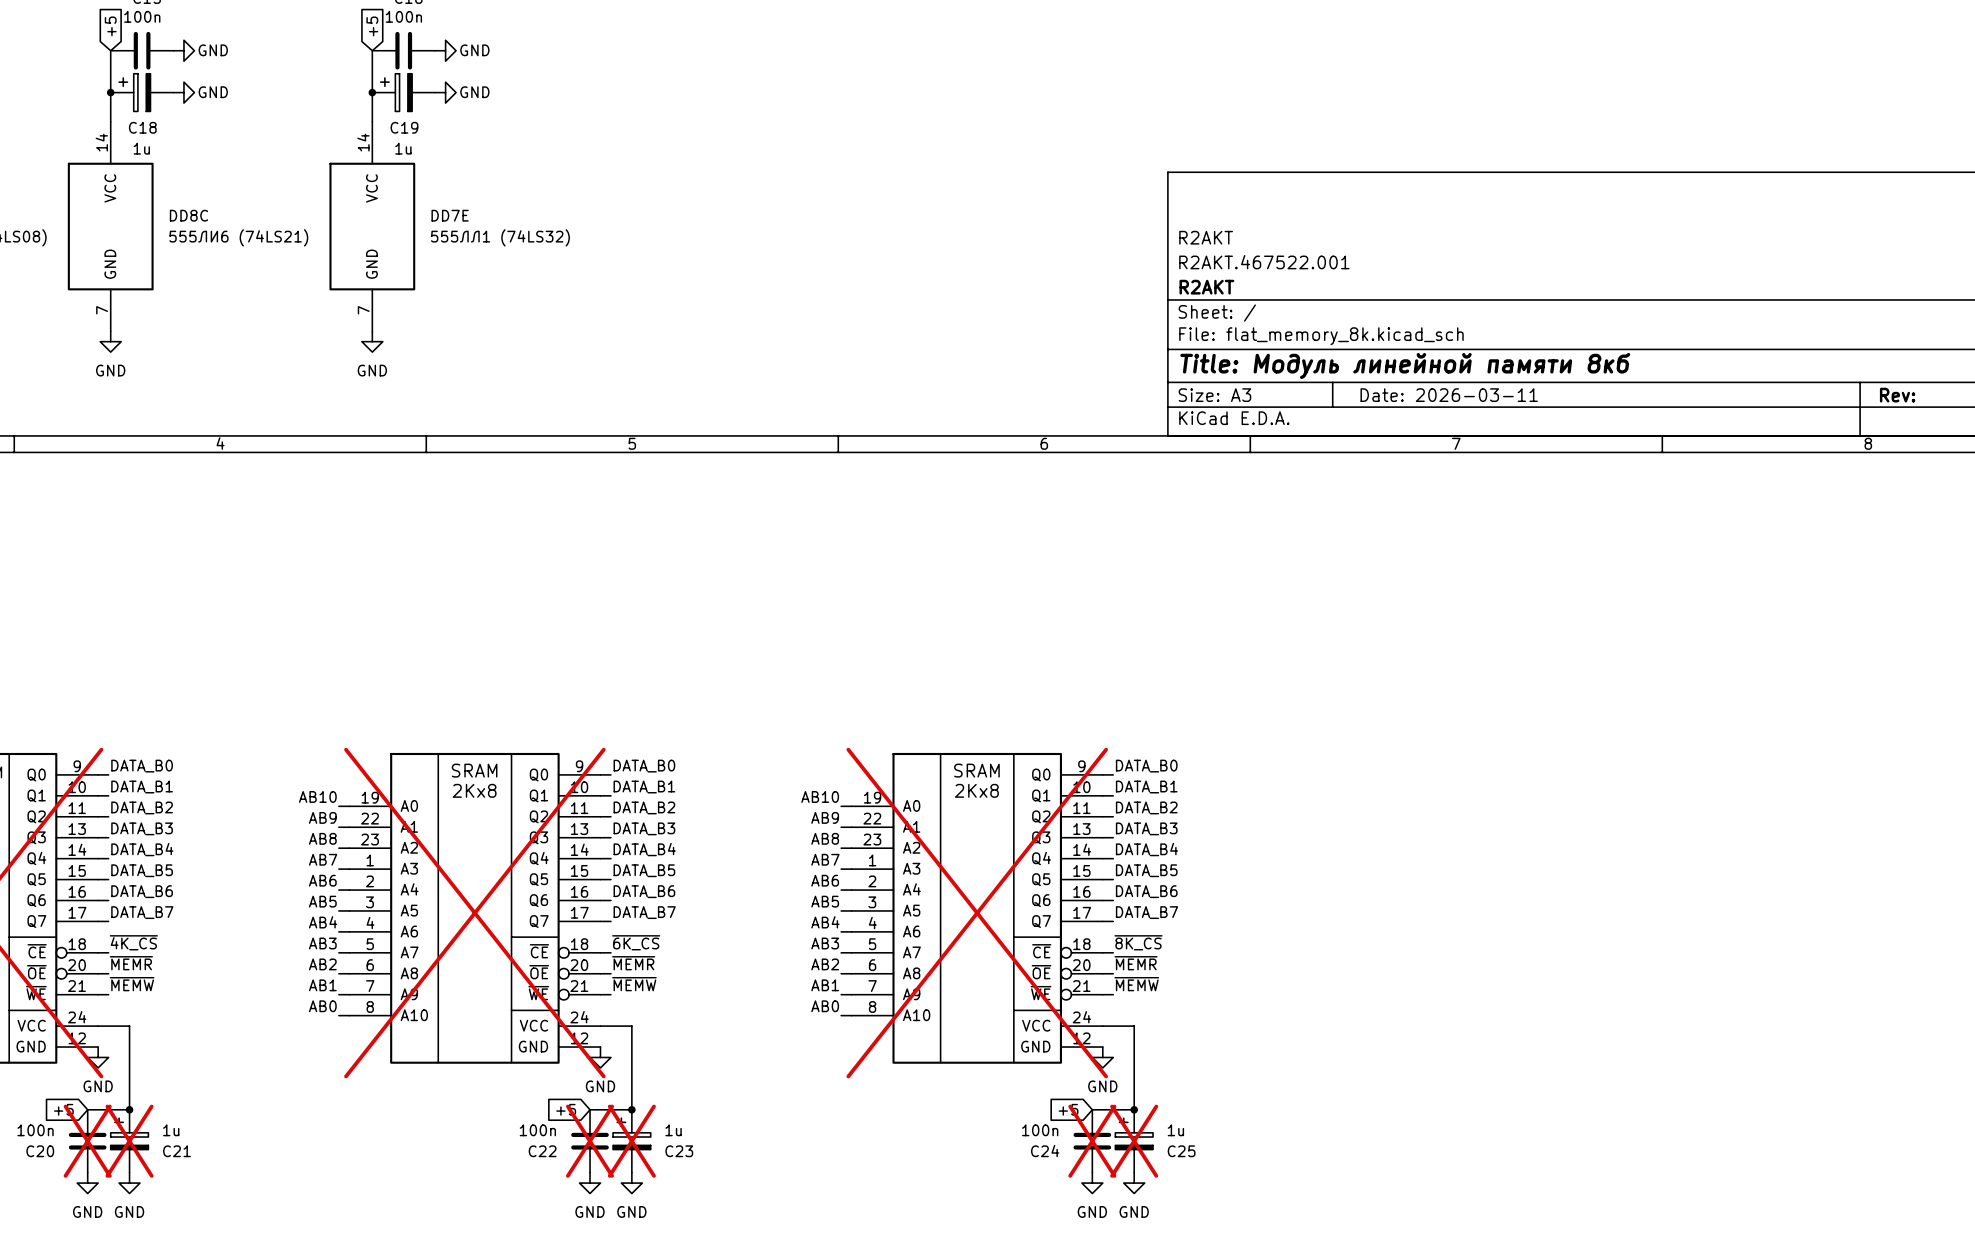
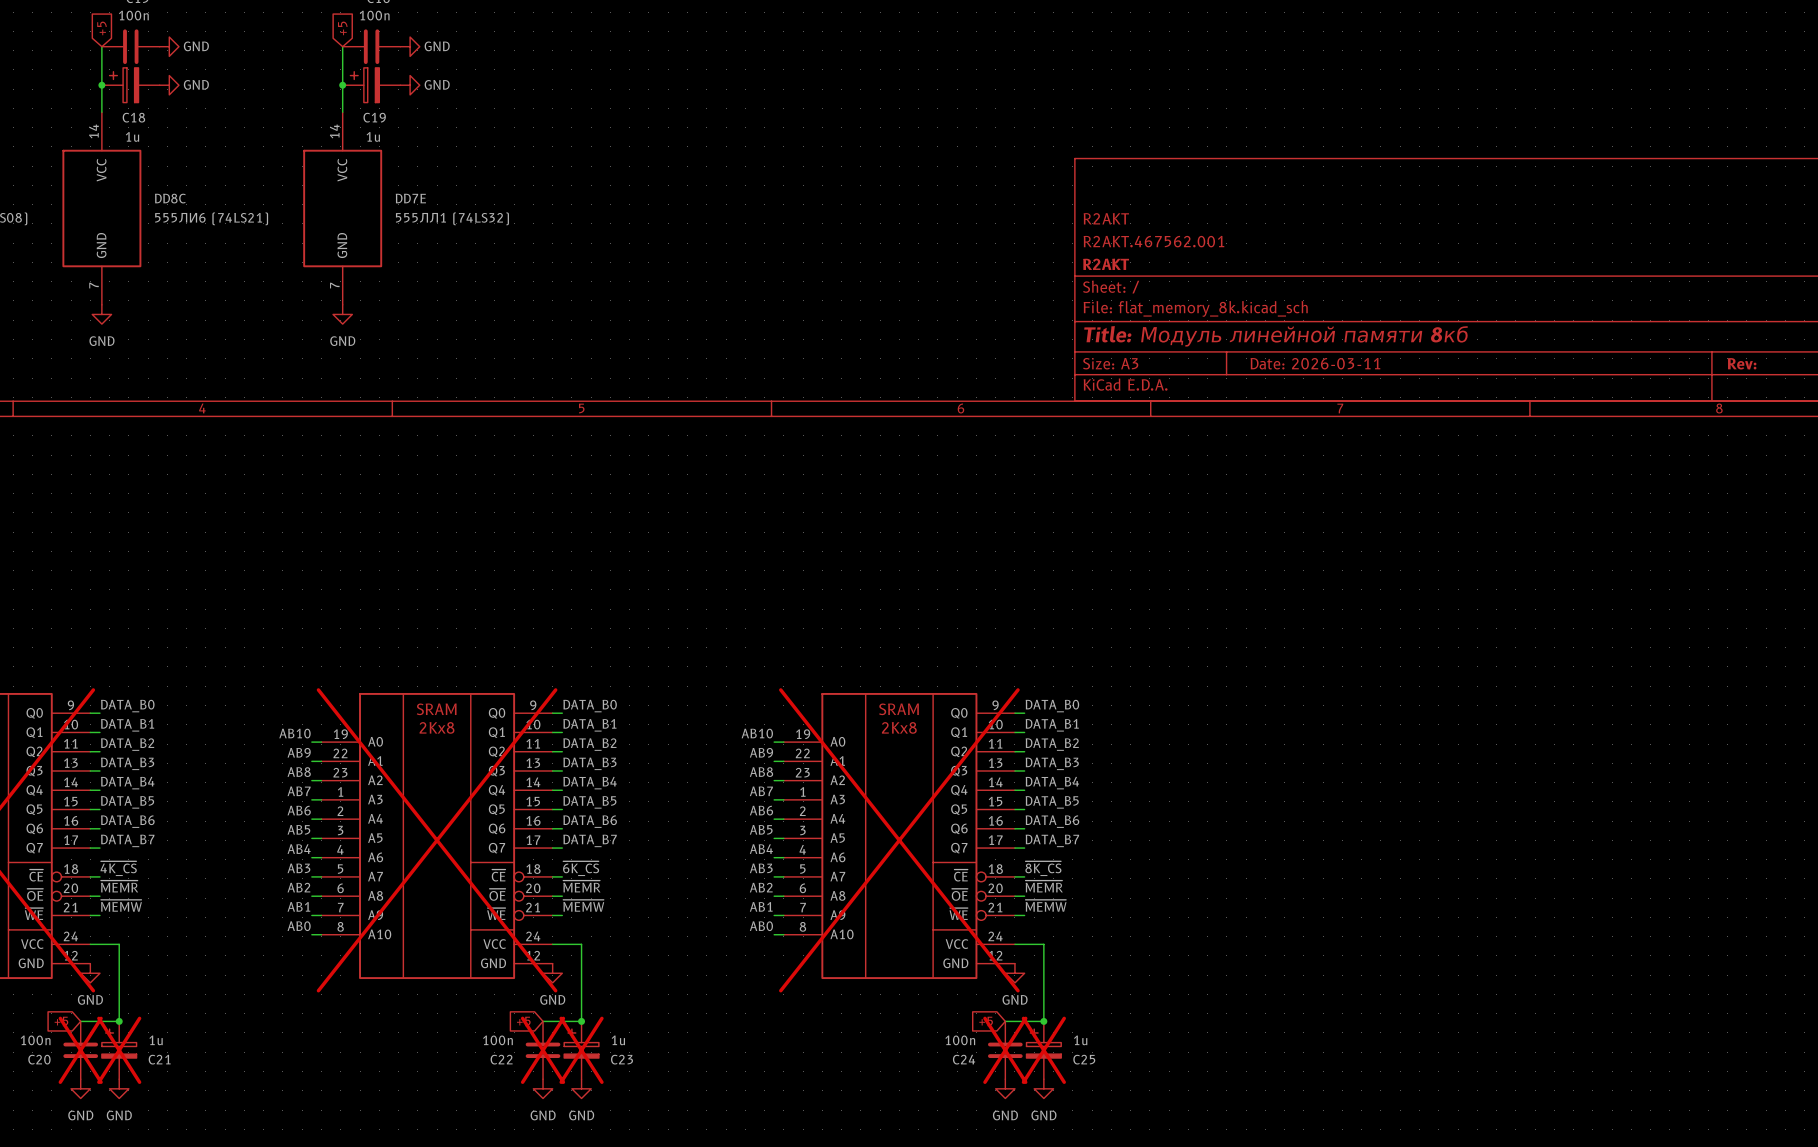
title block: R2AKT.467522.001 (1264, 262) -> R2AKT.467562.001 (1153, 241)

